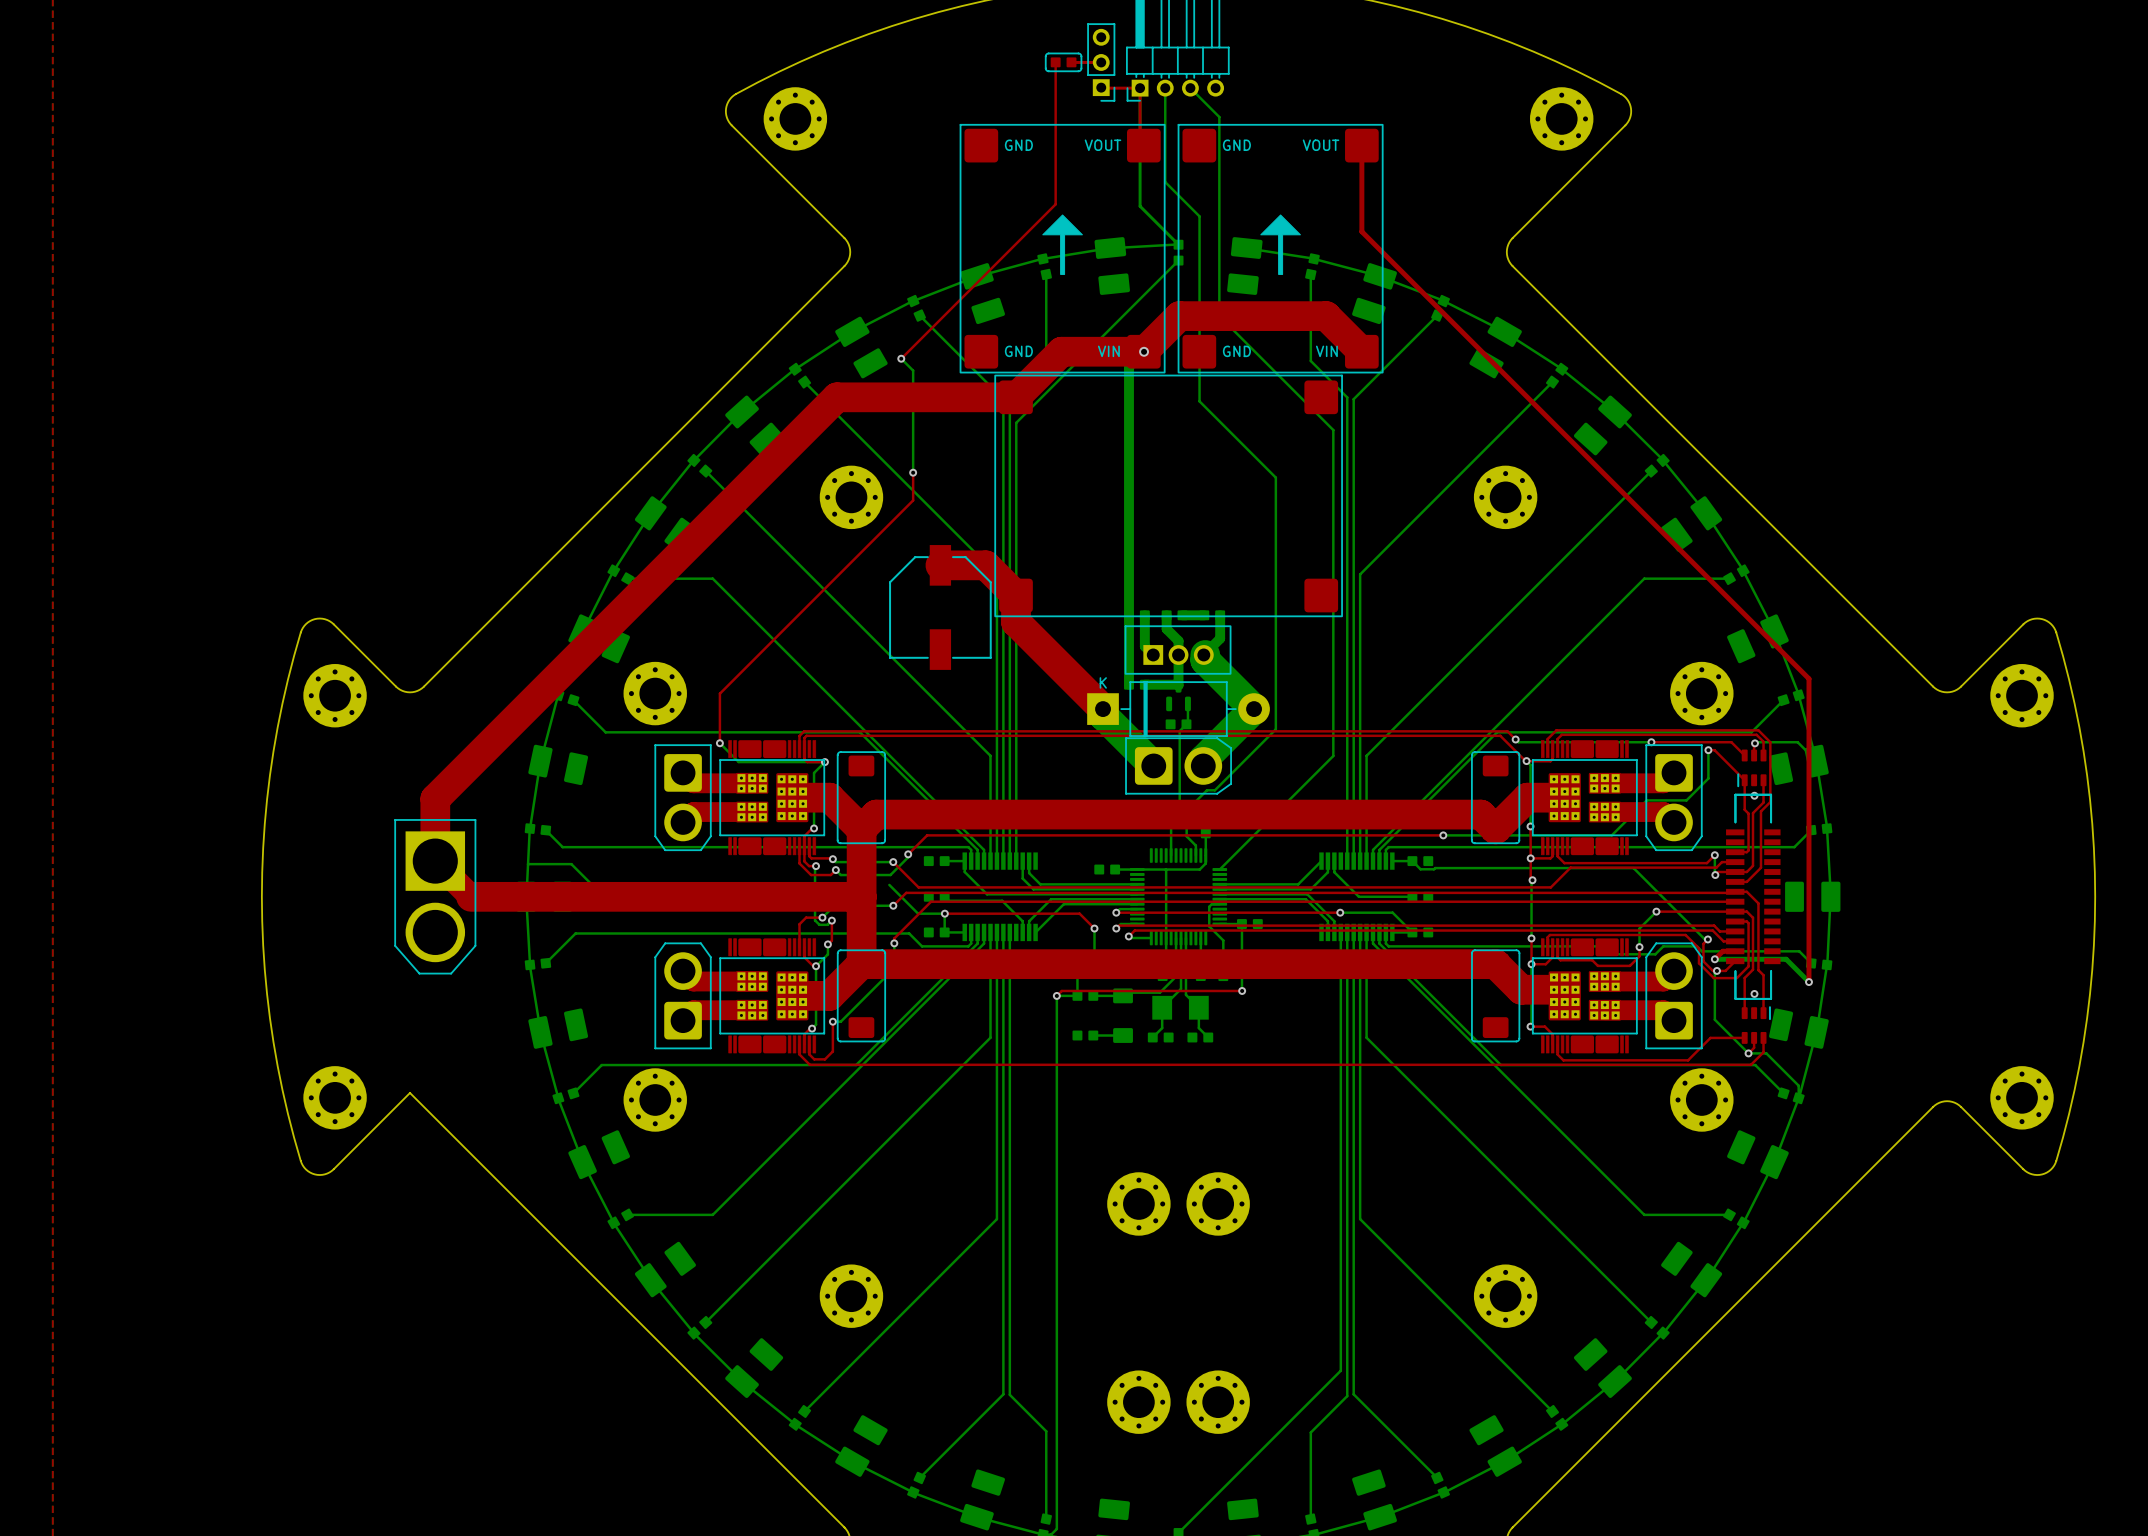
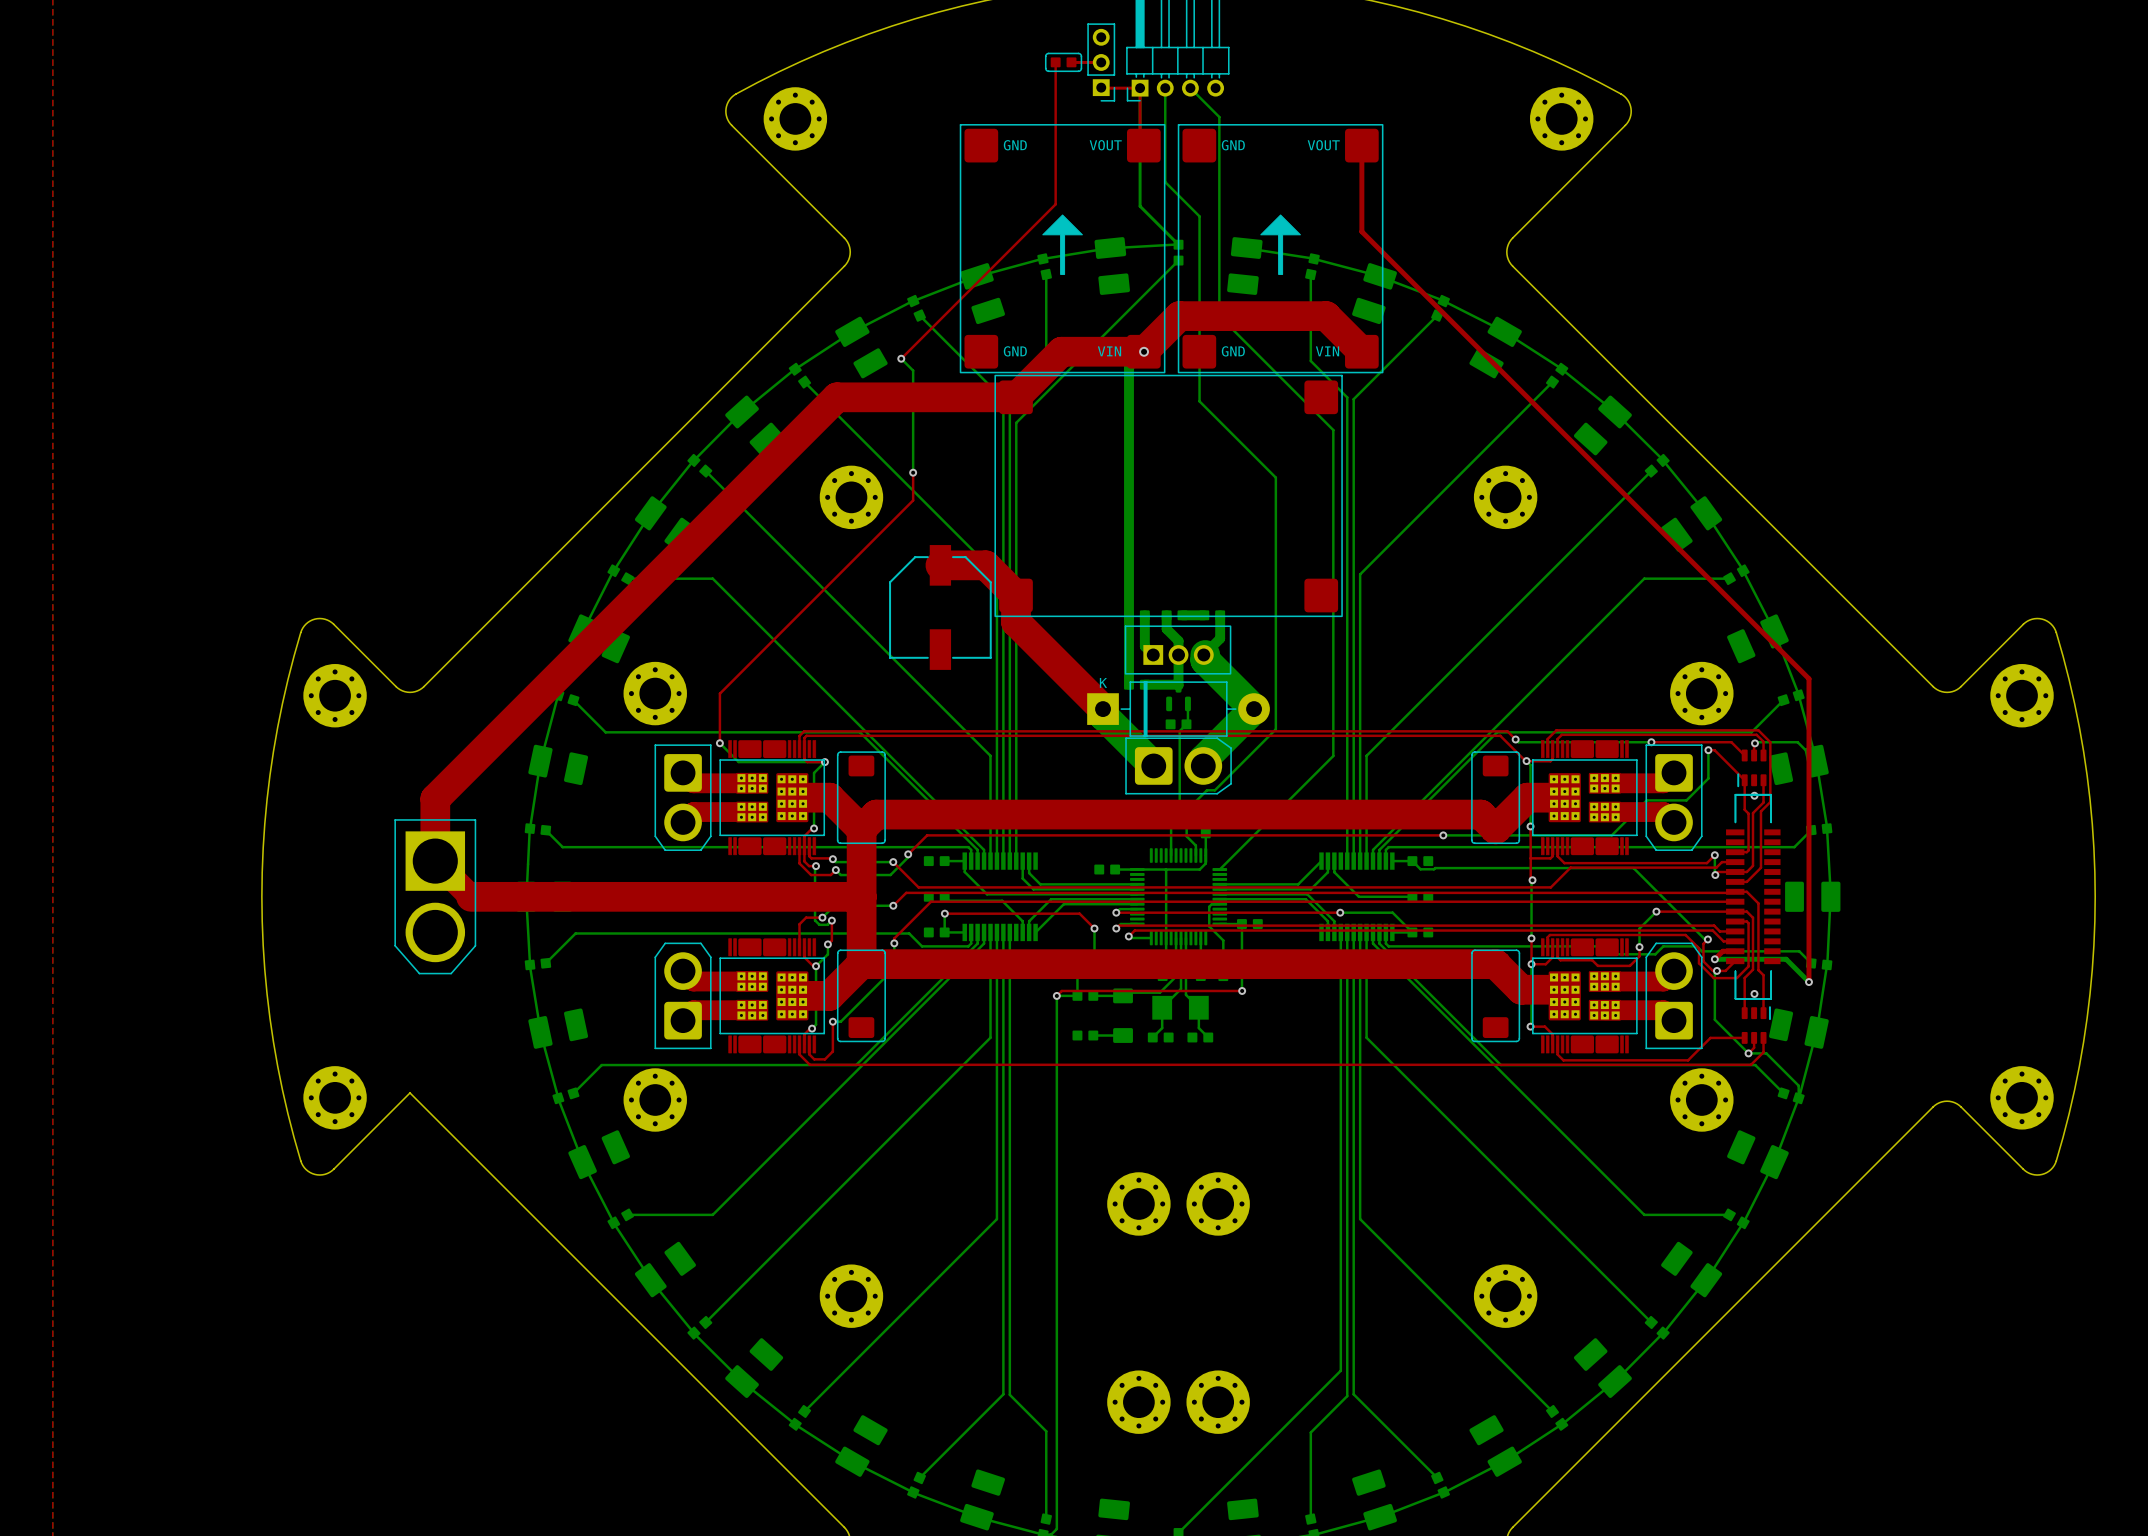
via: (1530, 858) -> none
bottom track: (528, 864) (571, 864) (592, 884) -> none
bottom track: (889, 884) (918, 913) (944, 913) -> none

